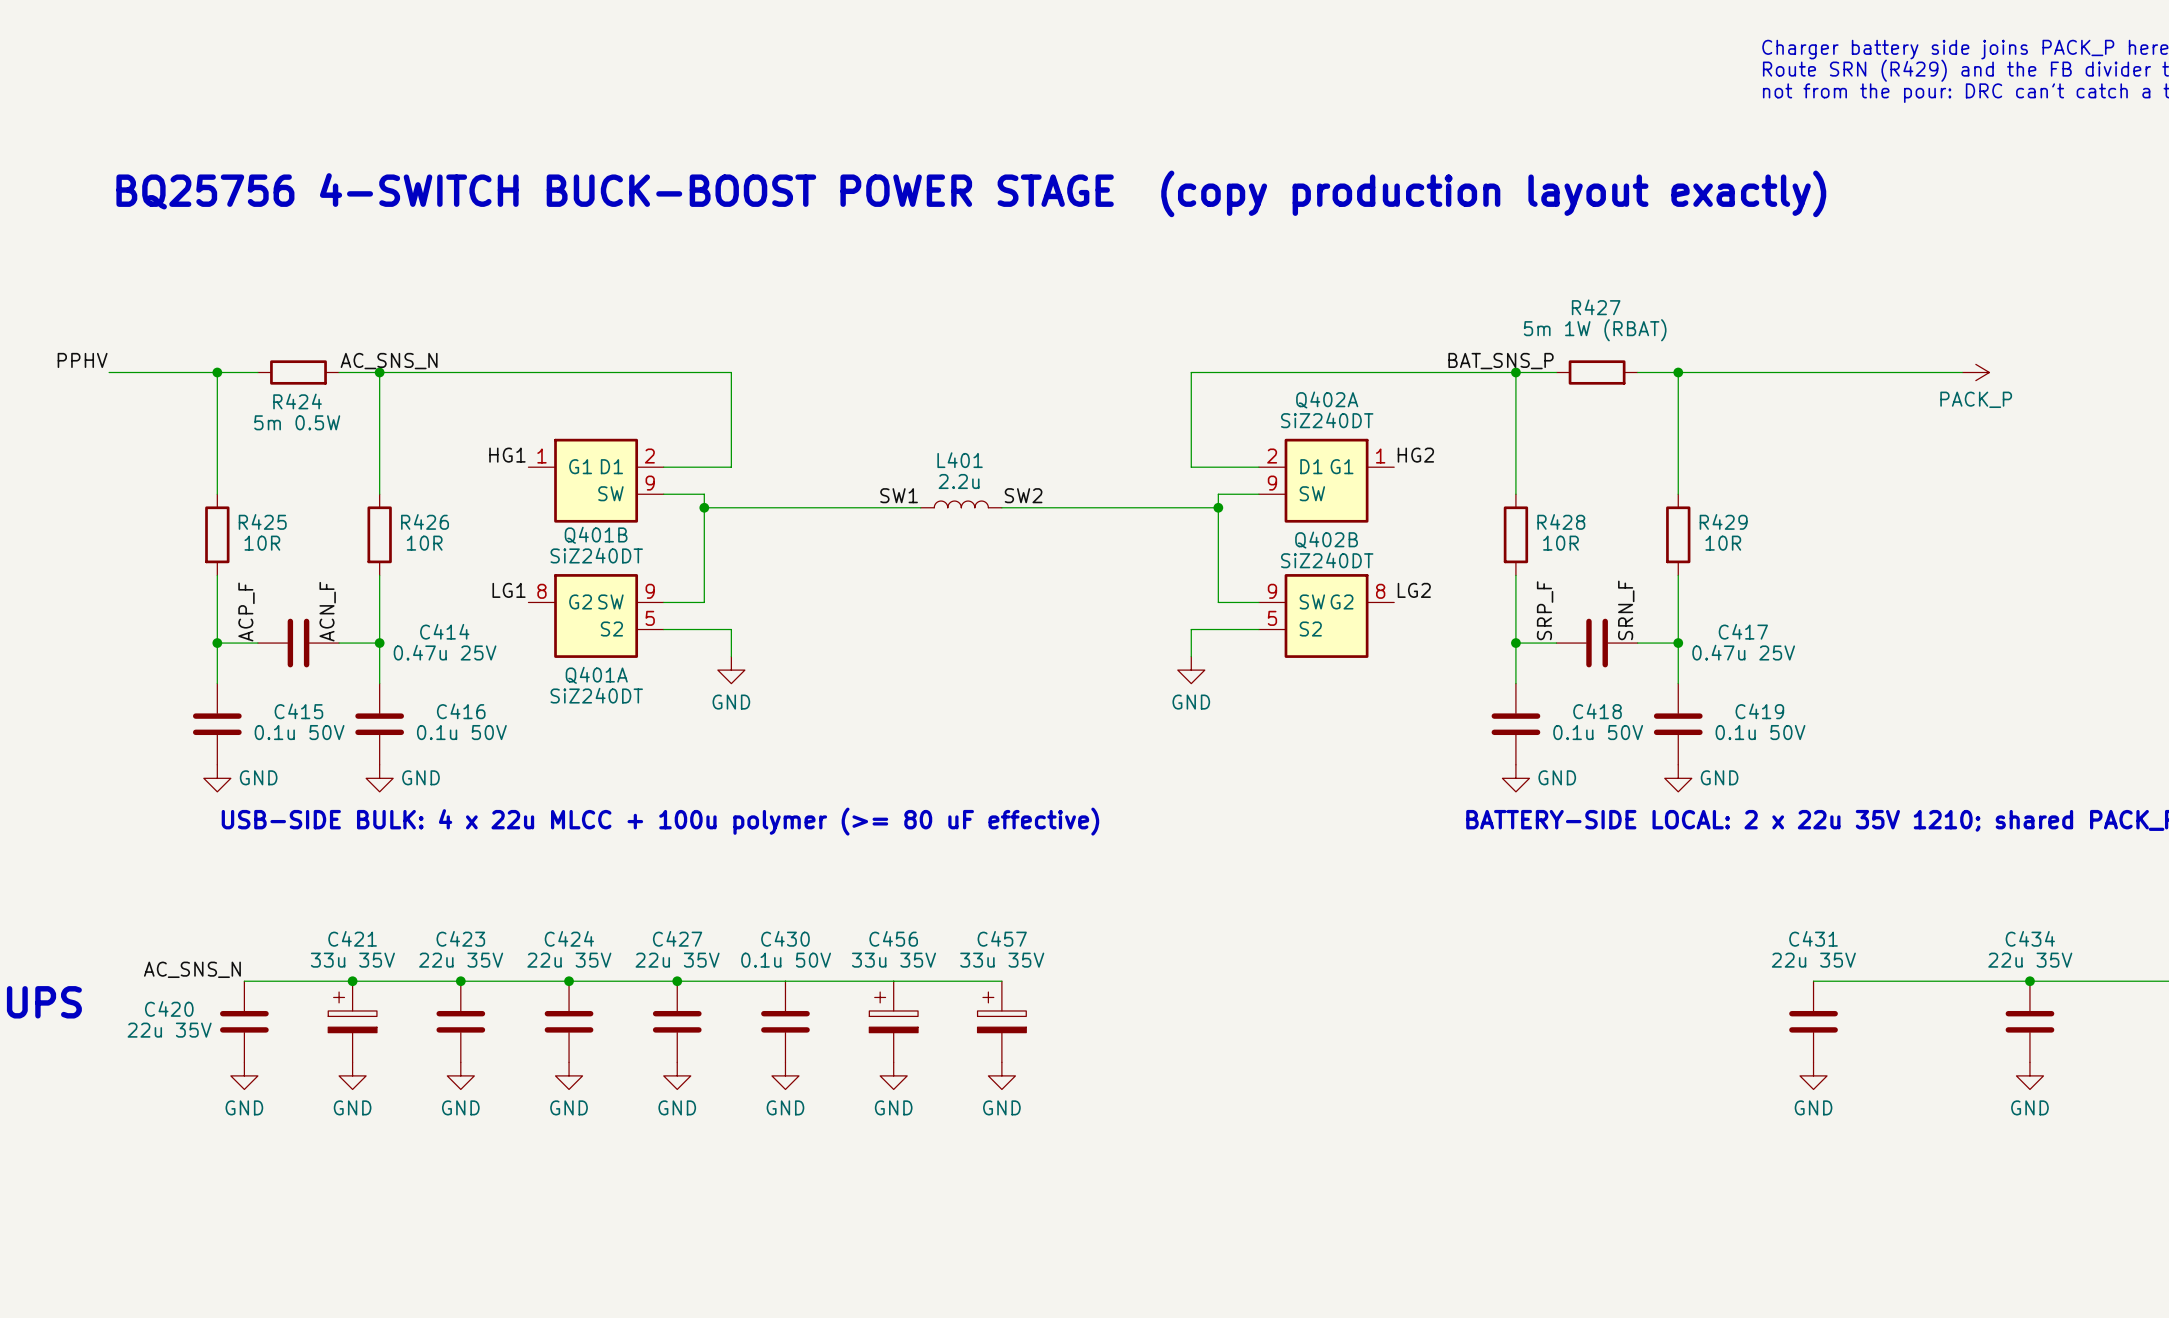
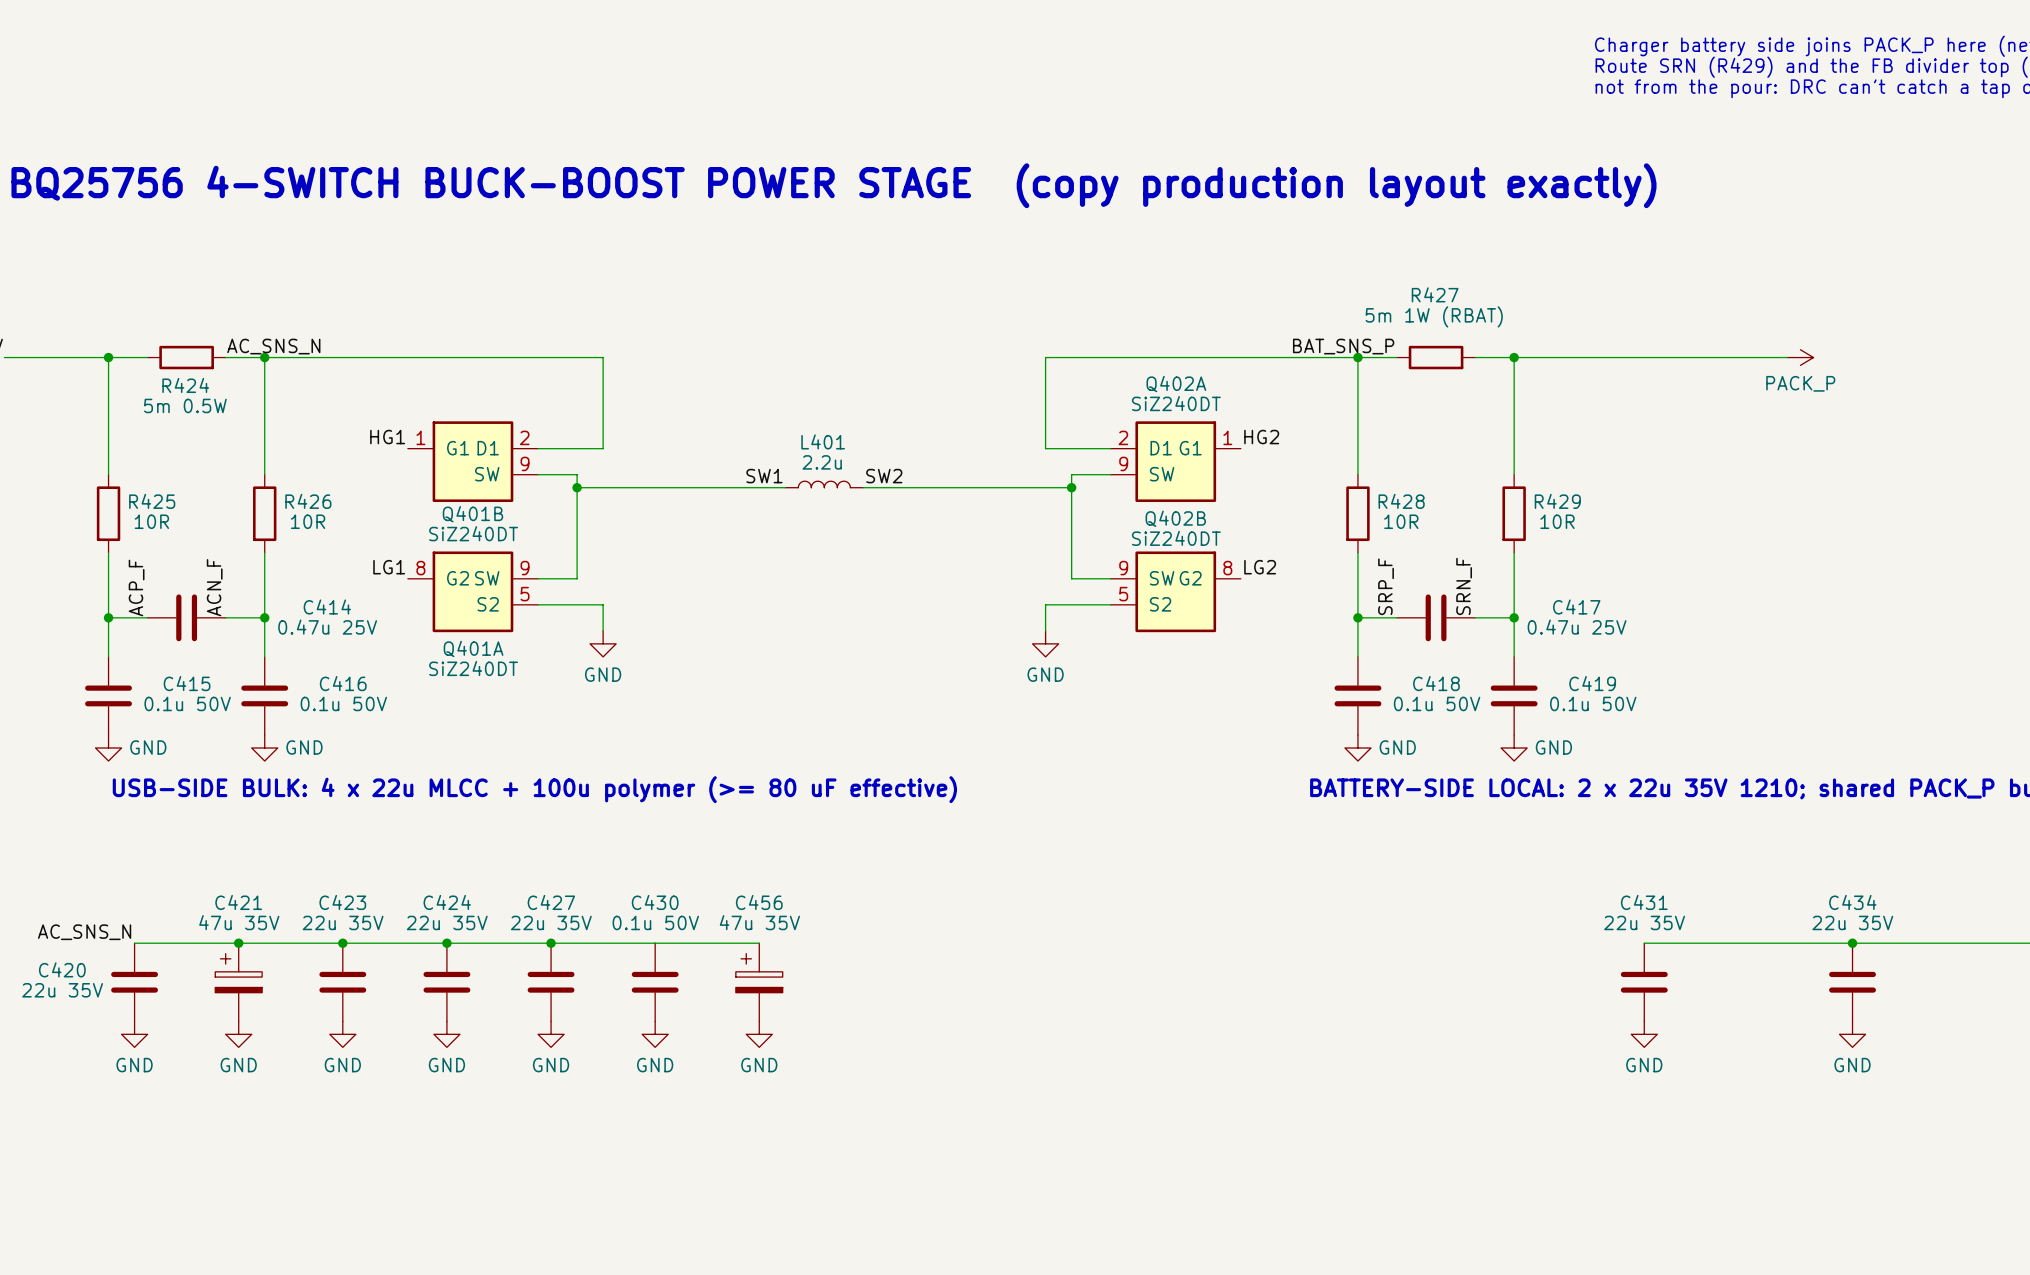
C421 value: 33u 35V (352, 960) -> 47u 35V (239, 922)
C456 value: 33u 35V (894, 960) -> 47u 35V (759, 922)
wire: (893, 981) (1001, 981) -> none
C457: 33u 35V (1001, 1021) -> none
power symbol: GND (1001, 1075) -> none

